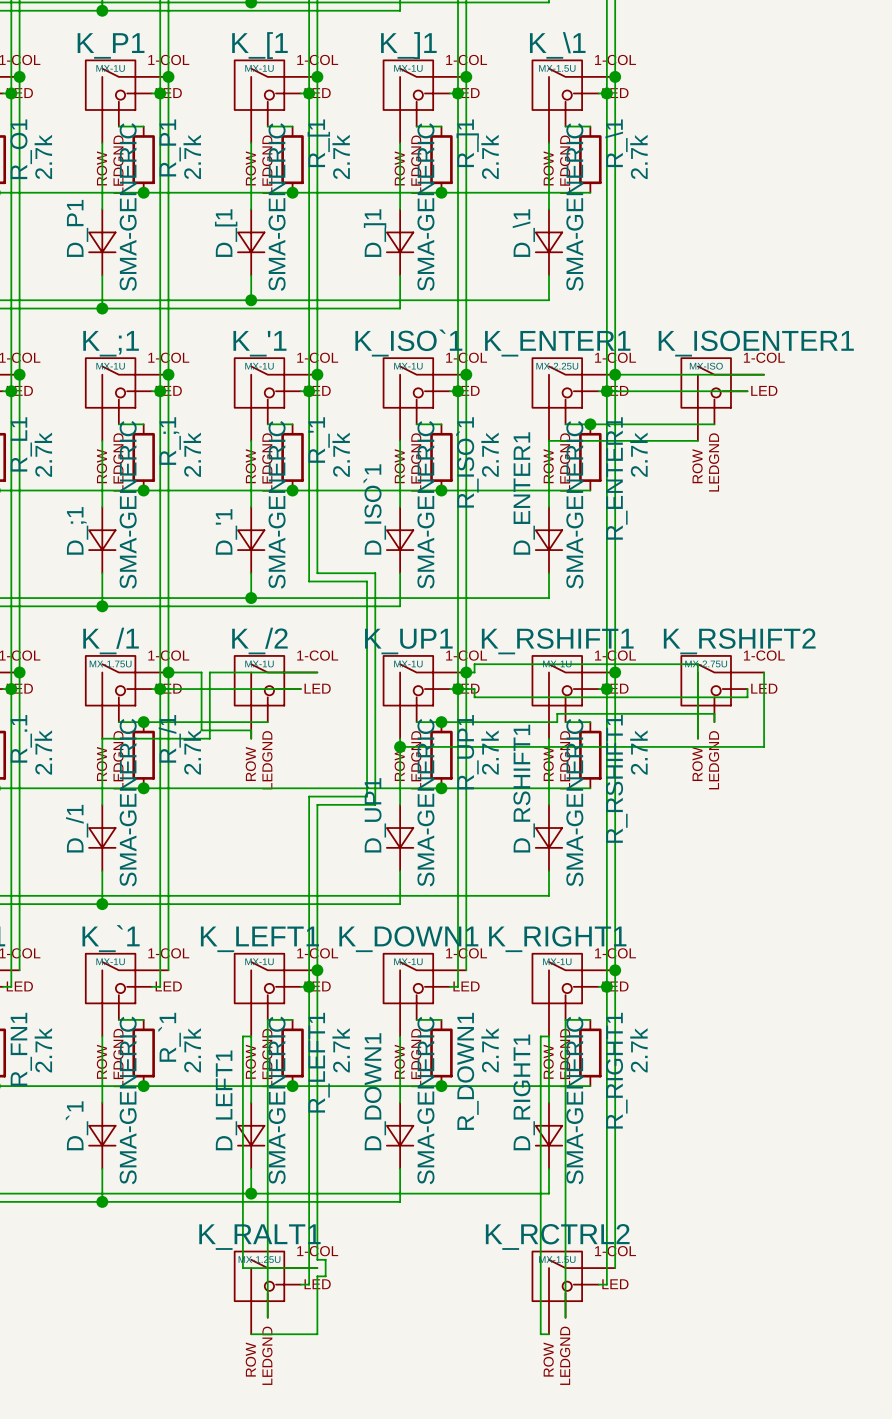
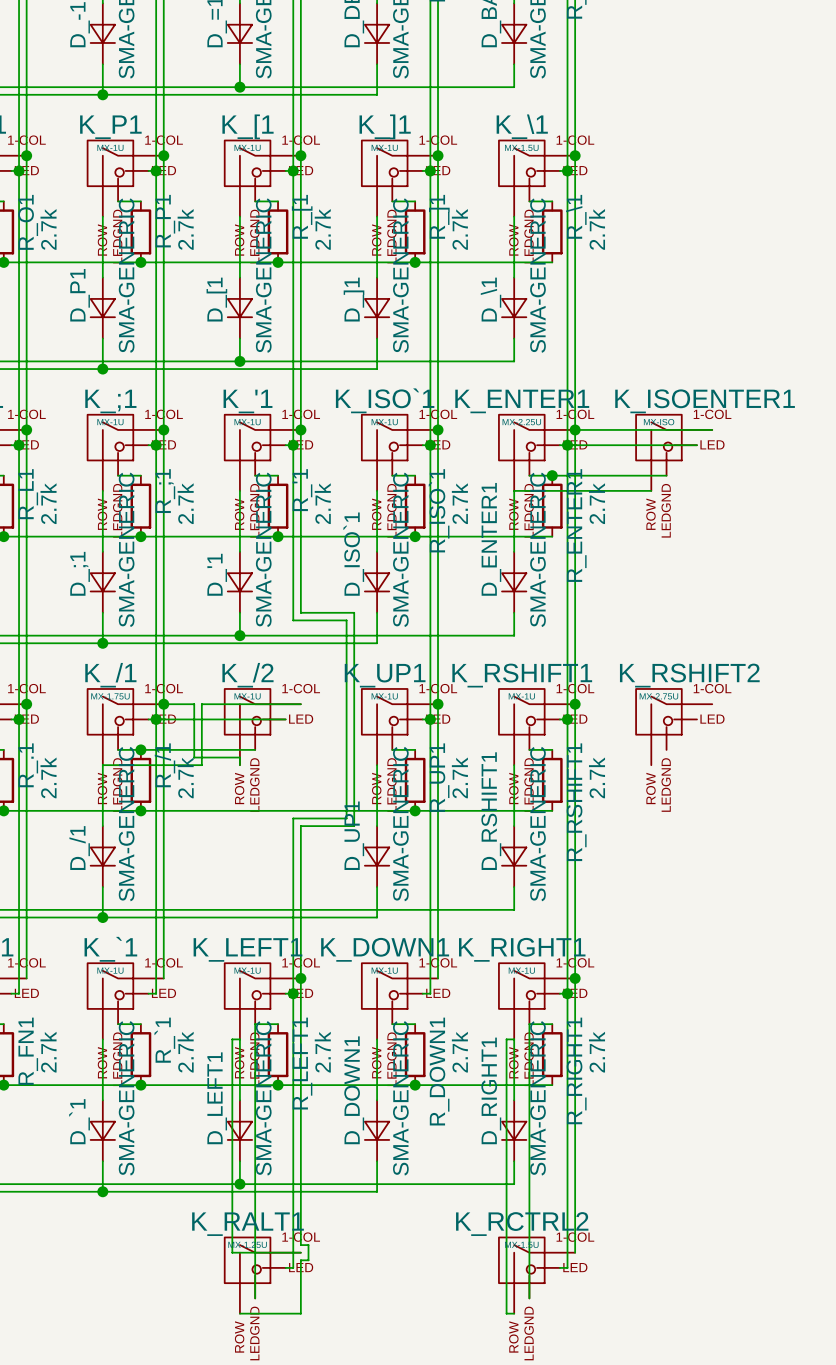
wire: (466, 672) (474, 672) (474, 664) (697, 664) (697, 738) -> none
wire: (764, 672) (764, 746) (400, 746) -> none
wire: (458, 689) (474, 689) (474, 697) (747, 697) (747, 689) -> none
wire: (441, 722) (557, 722) (557, 713) (714, 713) (714, 722) -> none
junction: (441, 722) -> none
junction: (400, 746) -> none

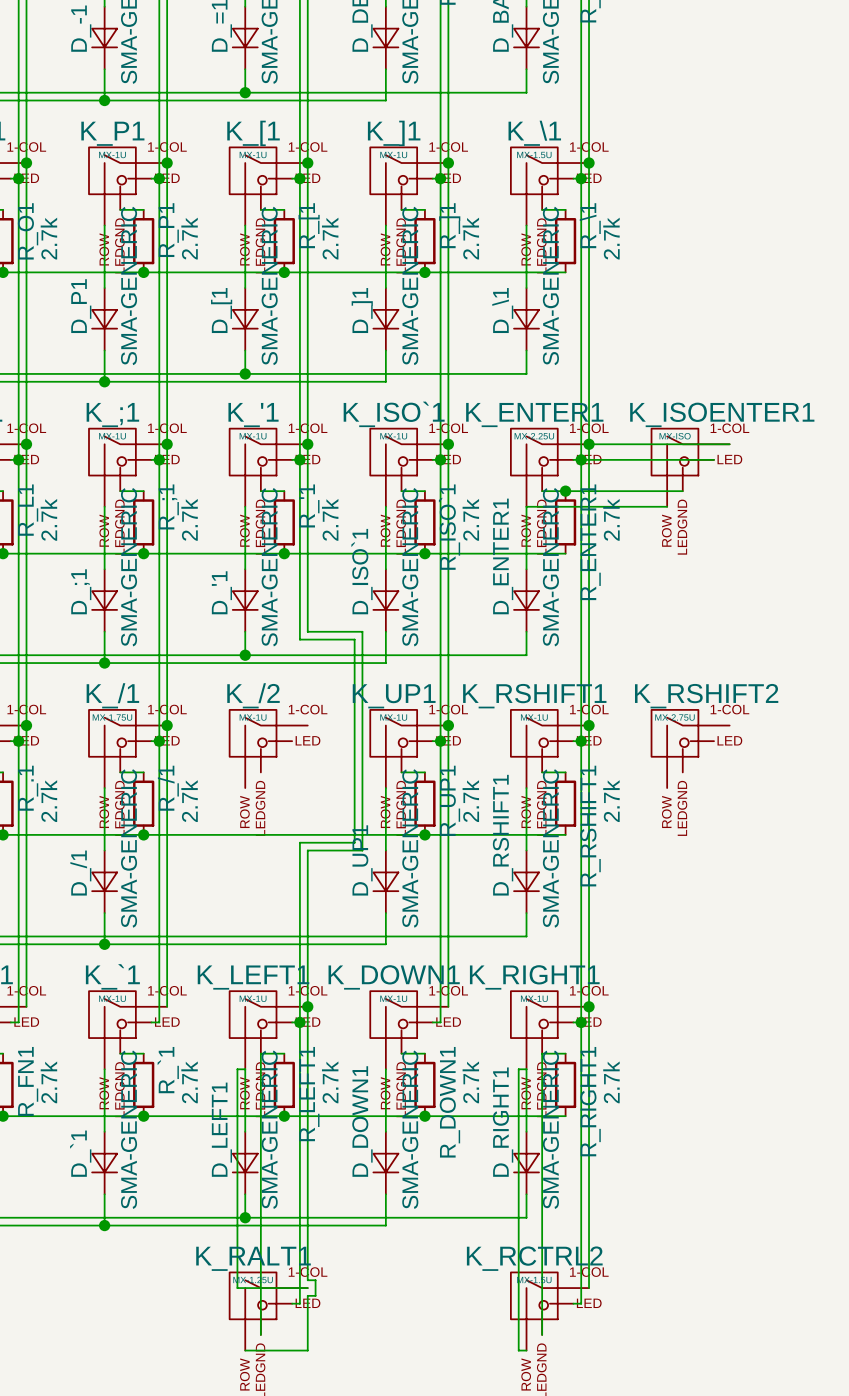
wire: (163, 704) (194, 704) (194, 757) (239, 757) (239, 765) -> none
wire: (300, 704) (201, 704) (201, 765) (102, 765) -> none
wire: (156, 719) (285, 719) -> none
wire: (140, 749) (255, 749) -> none
junction: (140, 749) -> none

